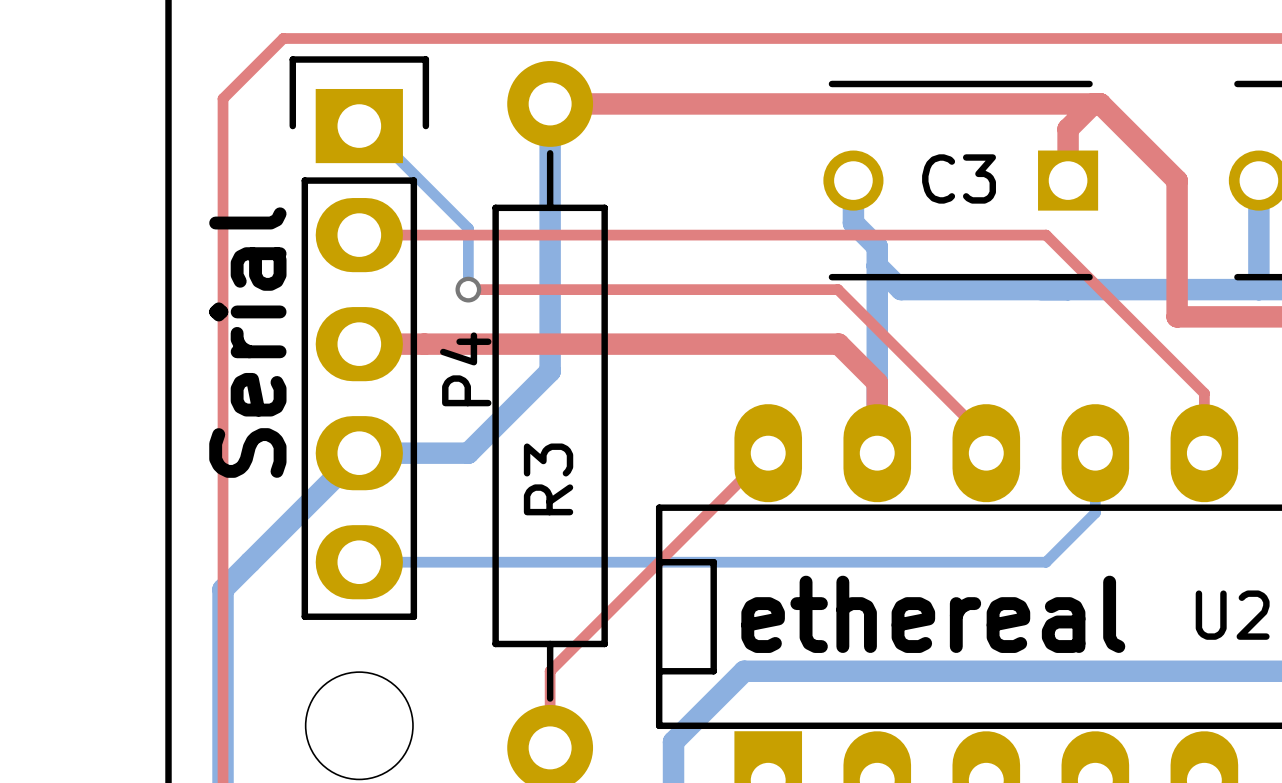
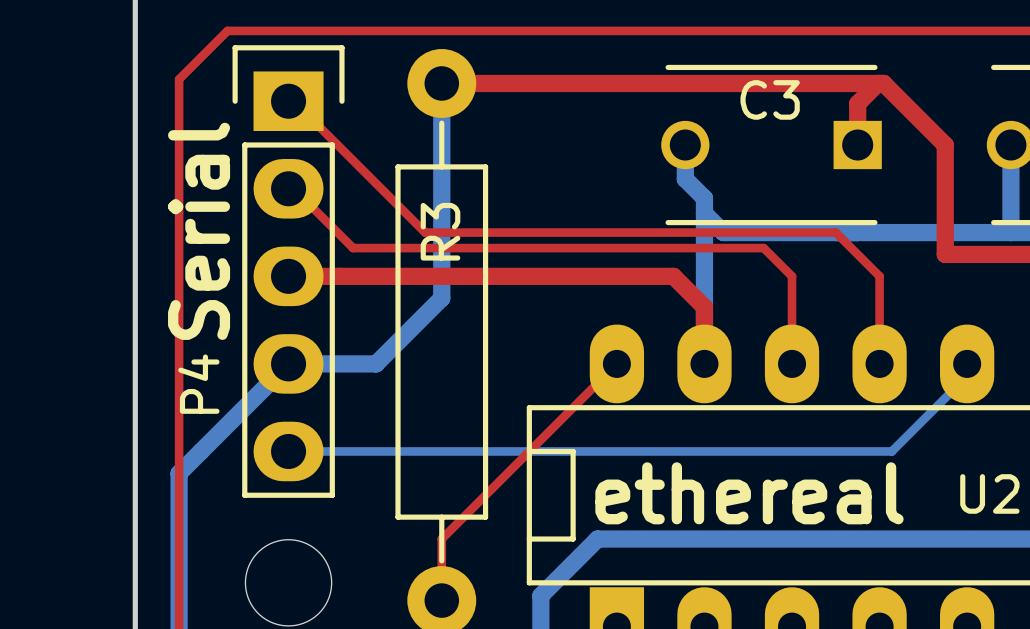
bottom track: (359, 126) (365, 126) (468, 228) (468, 289) -> none
C3 name position: C3 (959, 178) -> C3 (770, 99)
top track: (365, 235) (1046, 235) (1204, 393) (1204, 453) -> (293, 188) (353, 248) (763, 248) (792, 276) (792, 351)
top track: (468, 289) (529, 289) -> (293, 101) (425, 232)
via: (468, 289) -> none
top track: (838, 289) (986, 437) -> (672, 232) (835, 232) (879, 276) (879, 363)
text position: Serial (247, 342) -> Serial (199, 231)
P4 name position: P4 (465, 369) -> P4 (198, 384)
bottom track: (1095, 453) (1095, 512) (1046, 562) -> (967, 376) (891, 451) (840, 451)
R3 name position: R3 (548, 479) -> R3 (440, 231)

